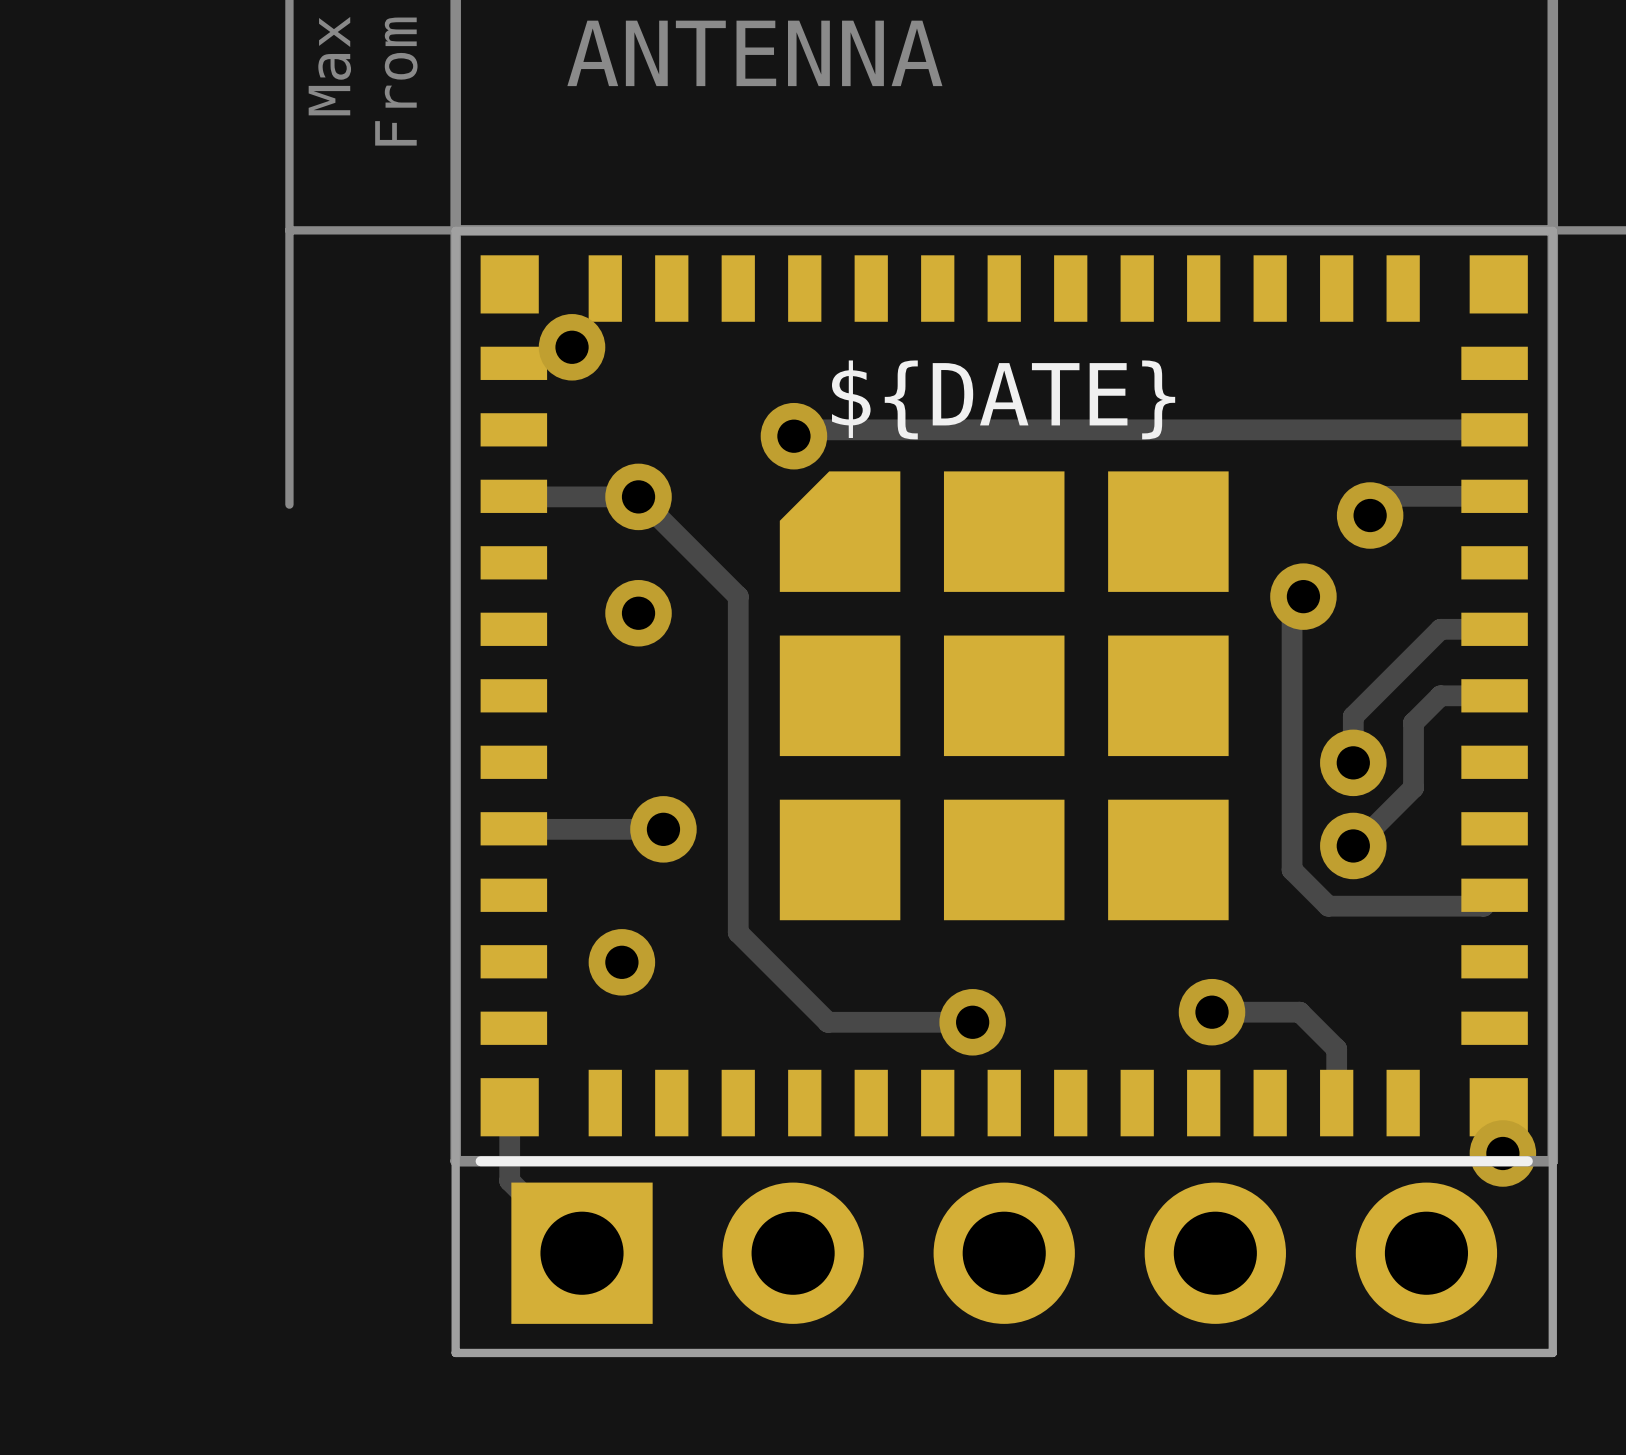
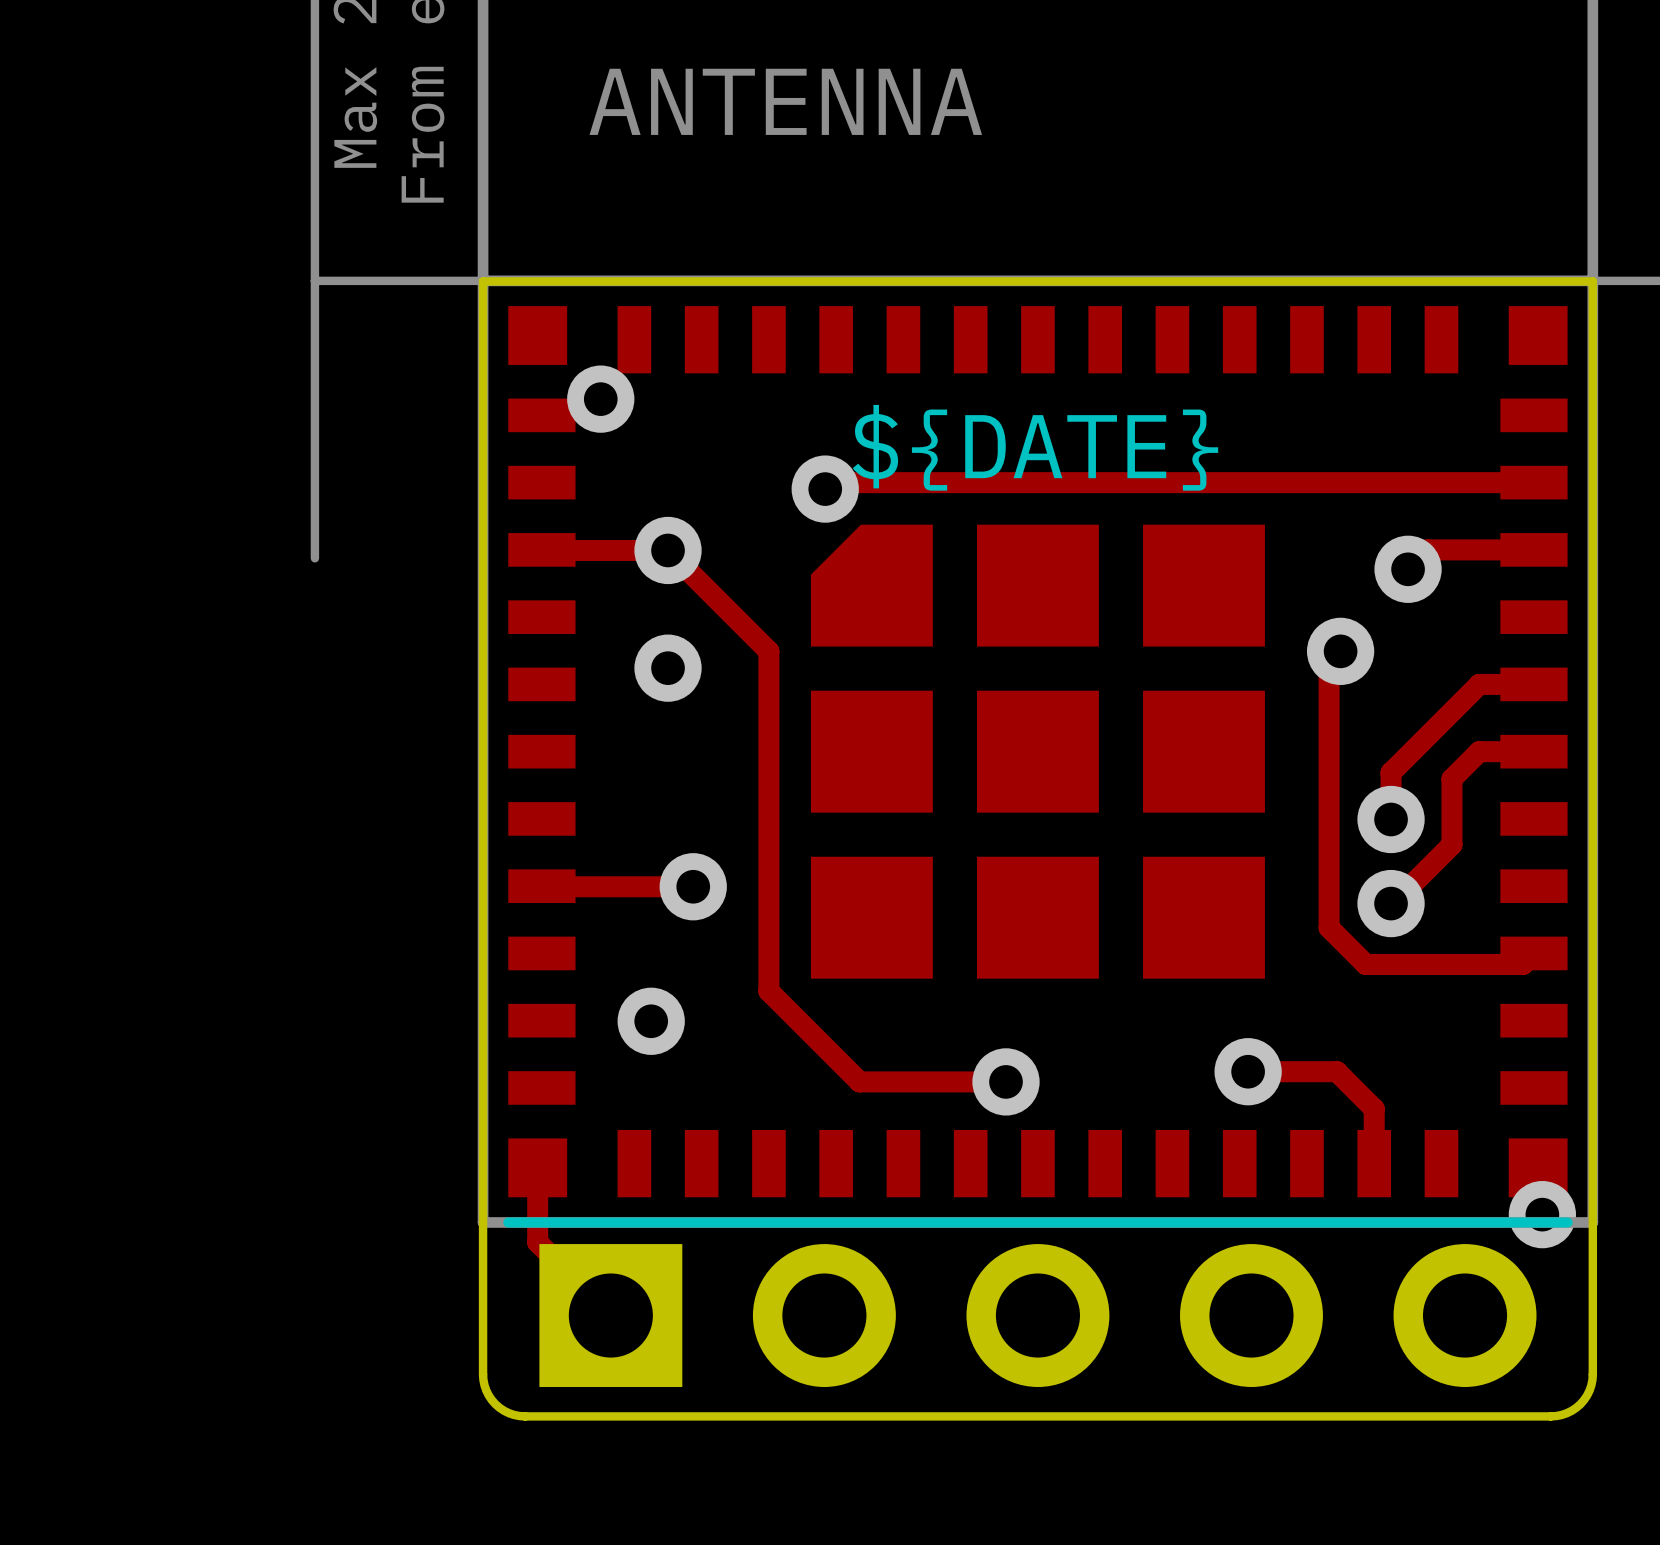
board edge: (455, 1311) (455, 1352) (497, 1352) -> (483, 1374) (486, 1390) (495, 1404) (509, 1413) (525, 1416)
board edge: (1552, 1311) (1552, 1352) (1511, 1352) -> (1592, 1374) (1589, 1390) (1580, 1404) (1566, 1413) (1550, 1416)

